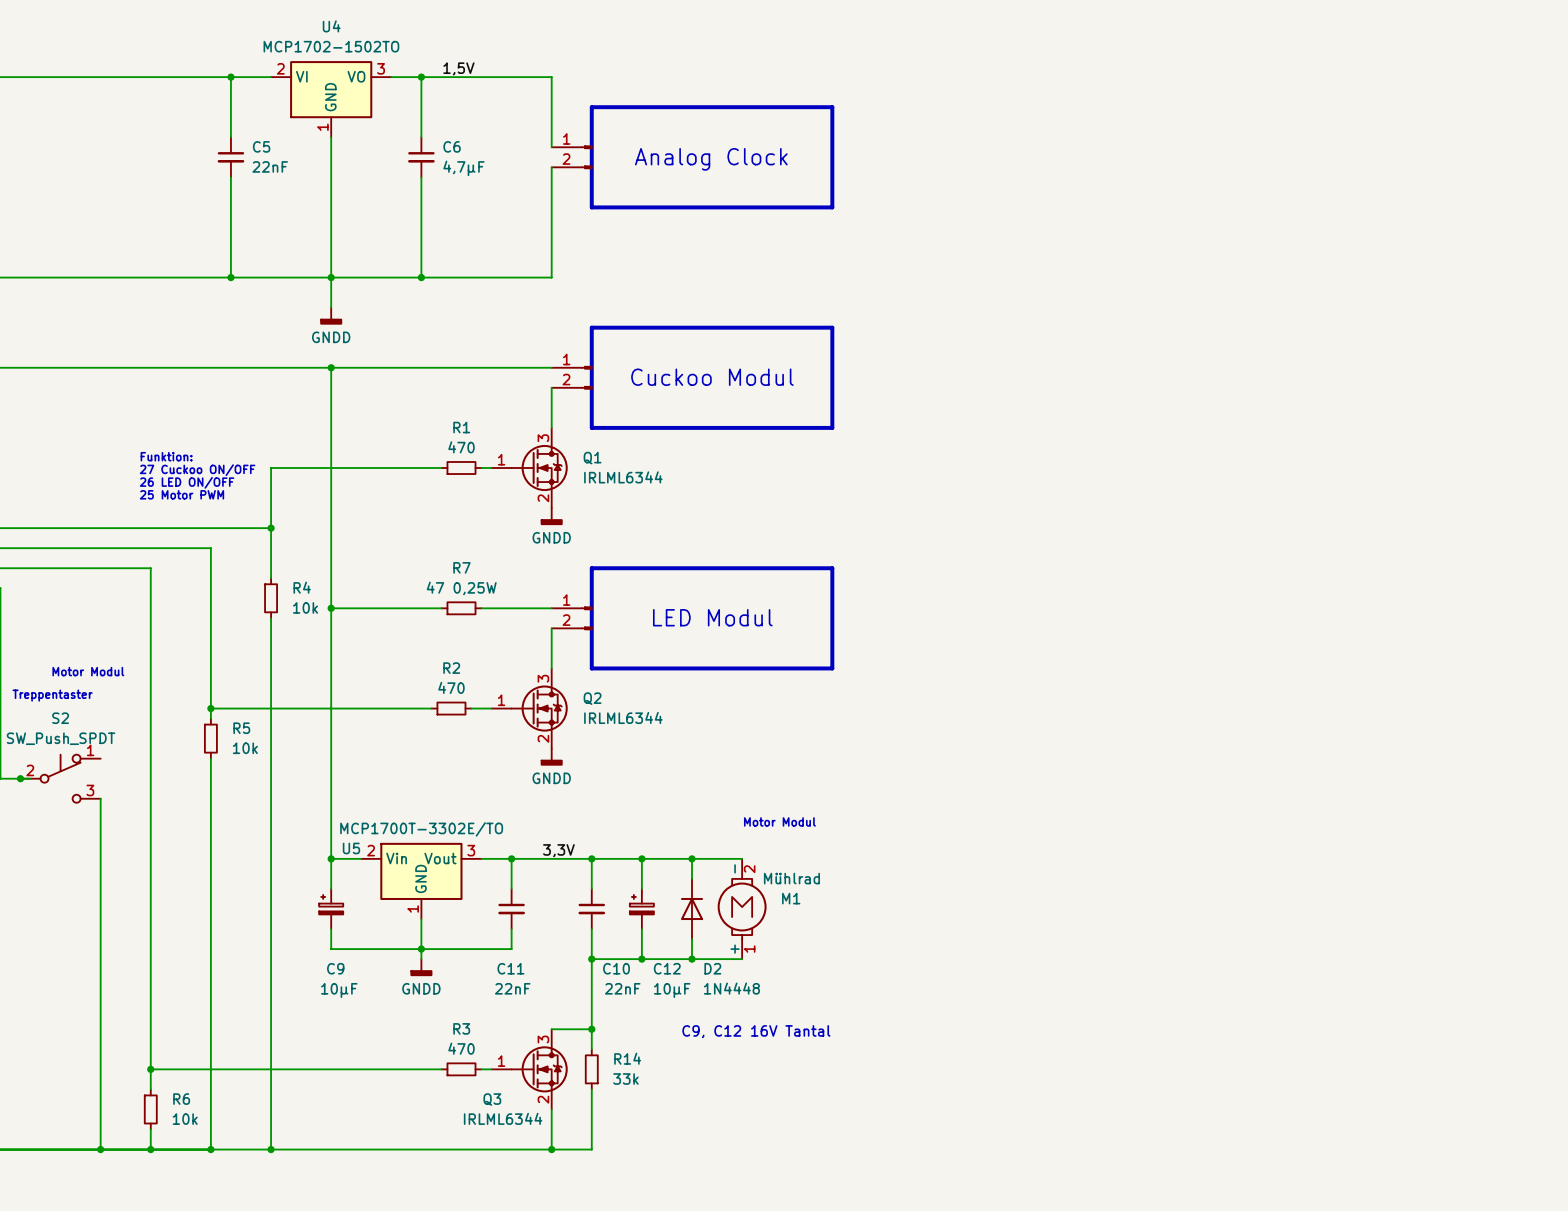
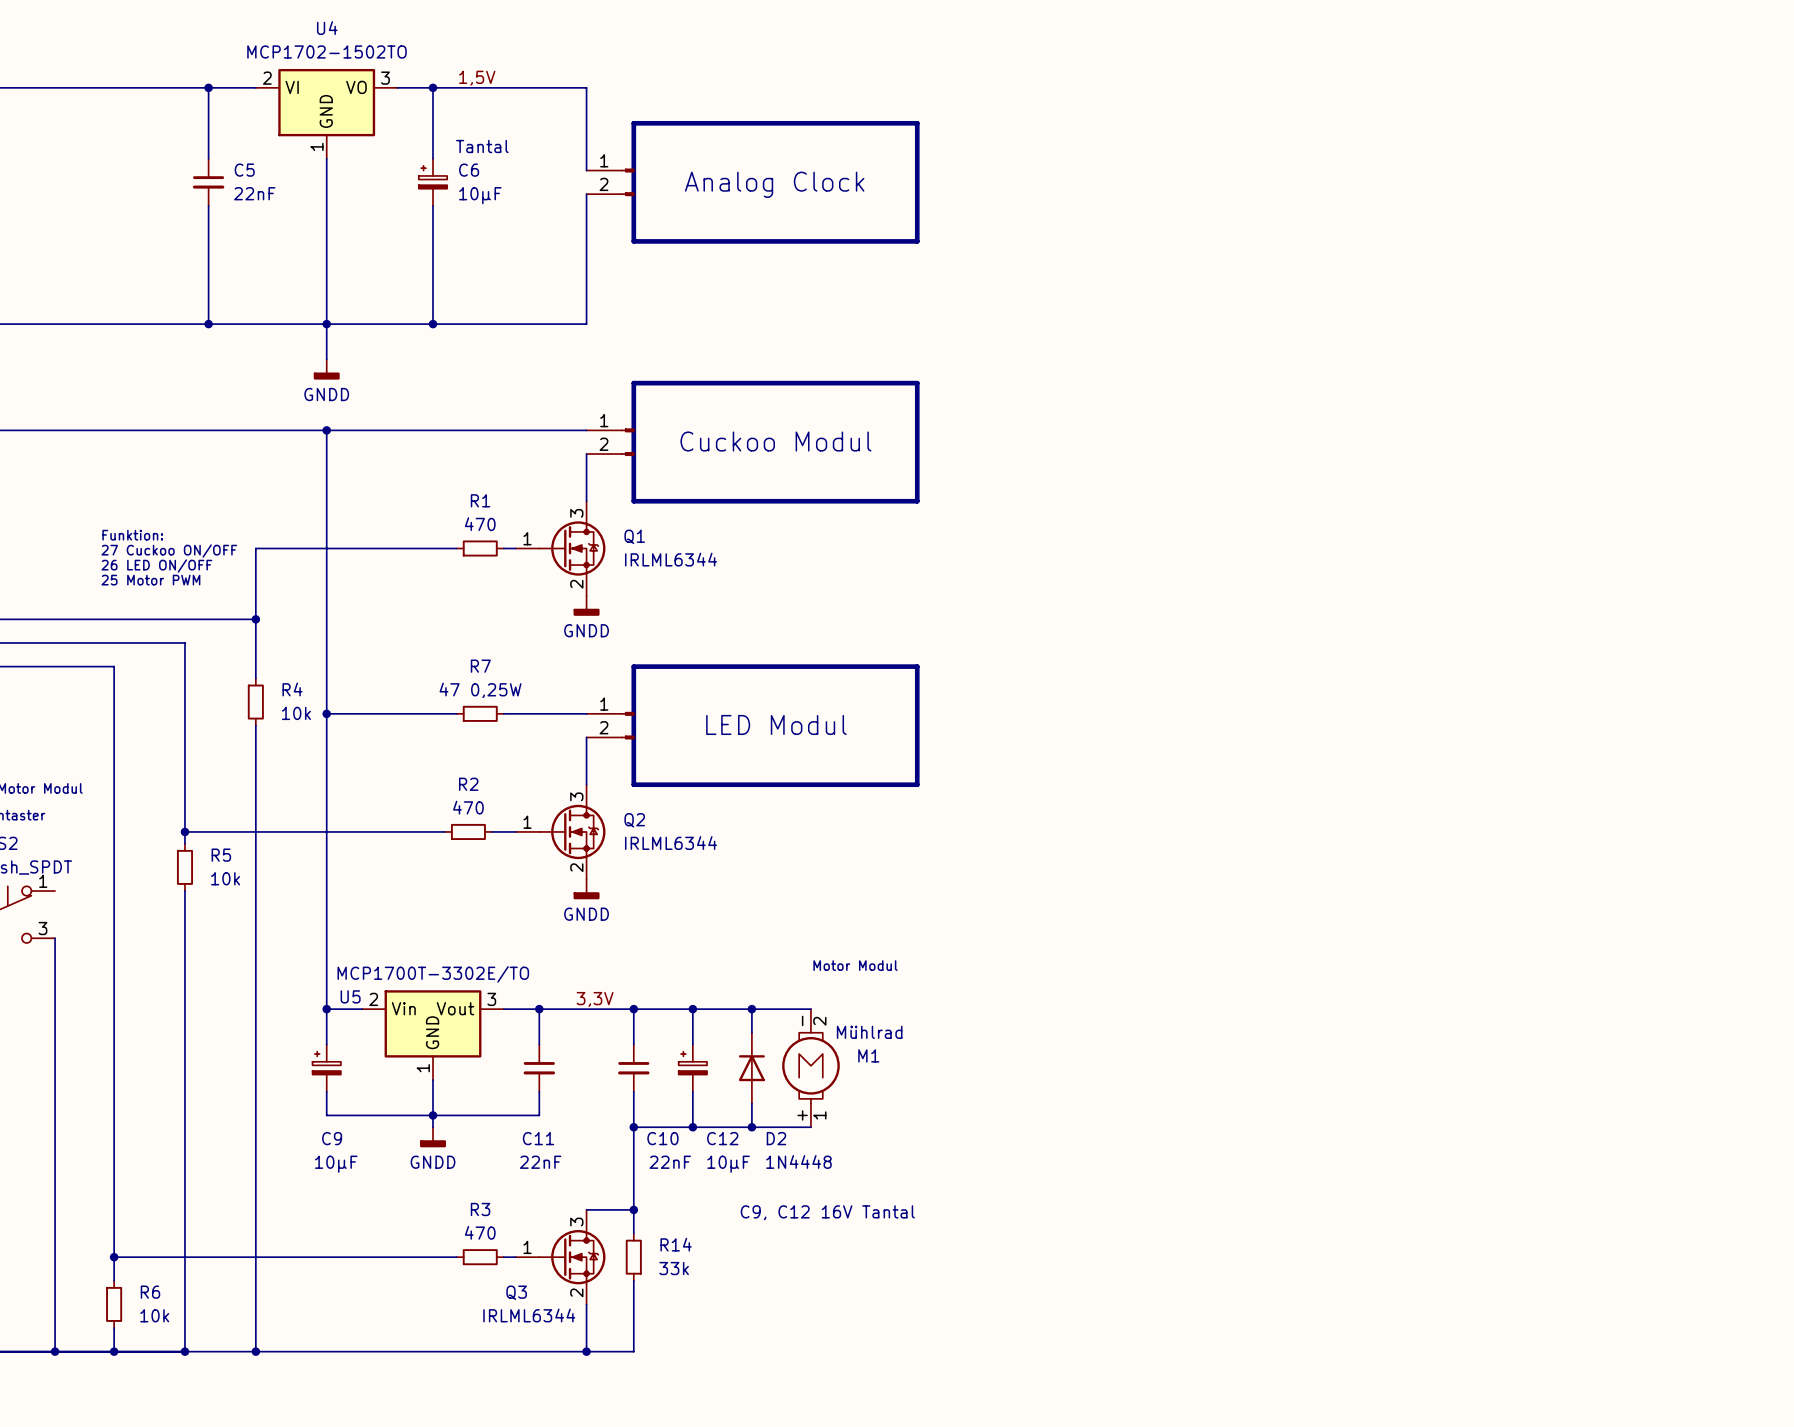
text: none -> Tantal (482, 146)
C6 symbol: [408, 137, 435, 178] -> [418, 158, 448, 206]
C6 value: 4,7µF (463, 168) -> 10µF (480, 195)

